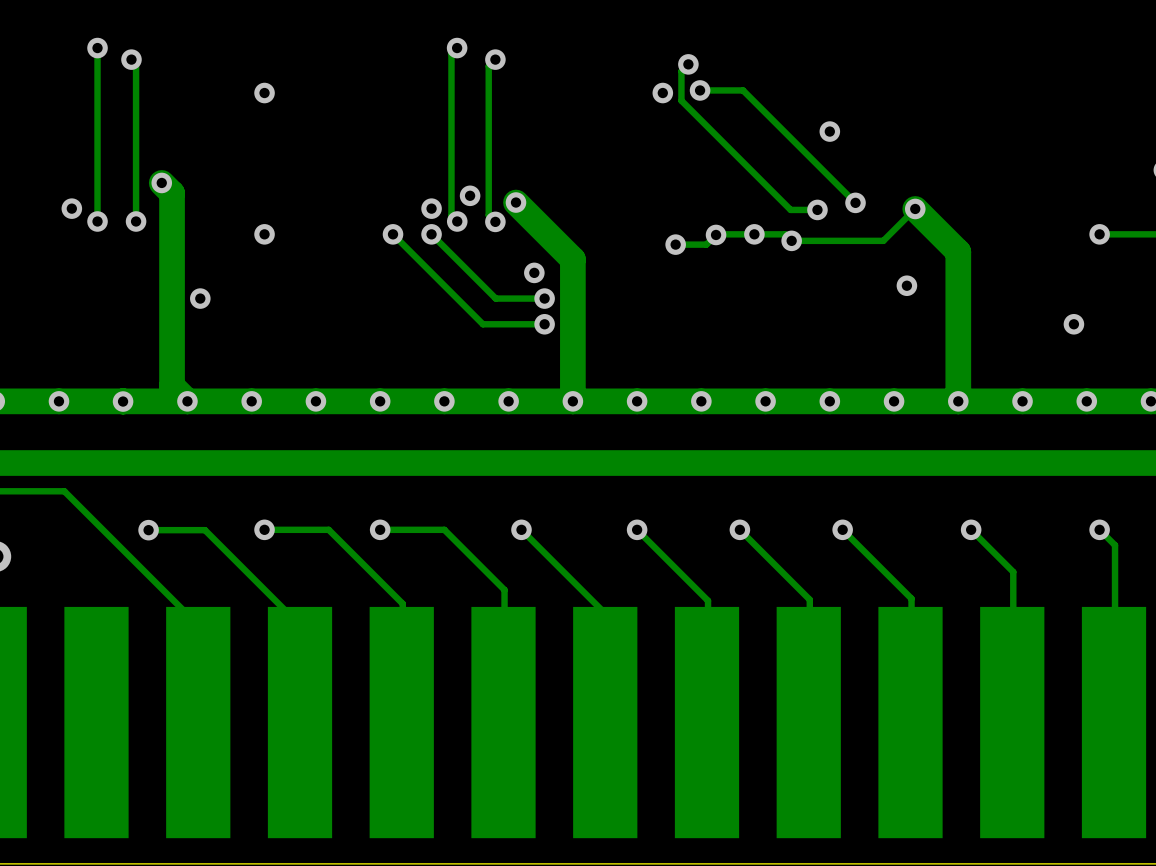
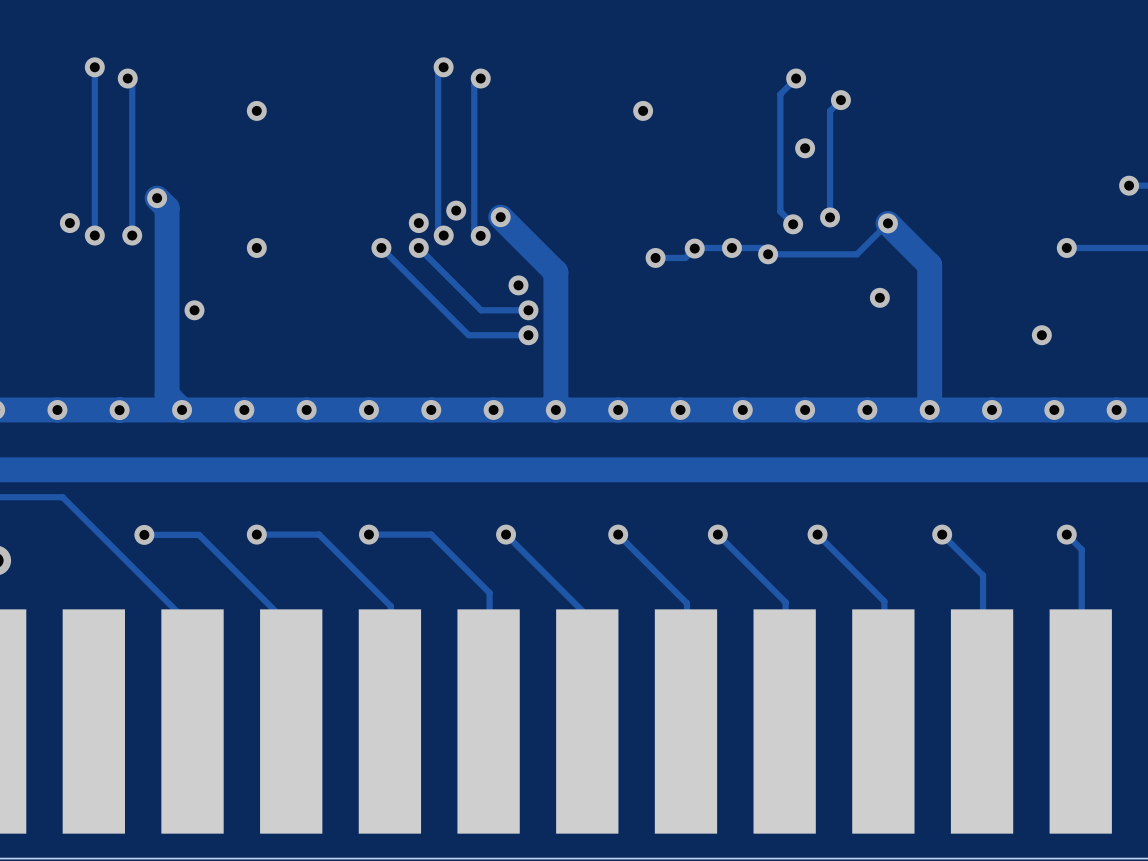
via: none -> (796, 78)
track: (688, 64) (681, 71) (681, 100) (790, 209) (817, 209) -> (796, 78) (780, 94) (780, 211) (793, 224)
via: (688, 64) -> none
via: none -> (840, 100)
track: (700, 90) (743, 90) (855, 202) -> (840, 100) (830, 111) (830, 217)
via: (700, 90) -> none

